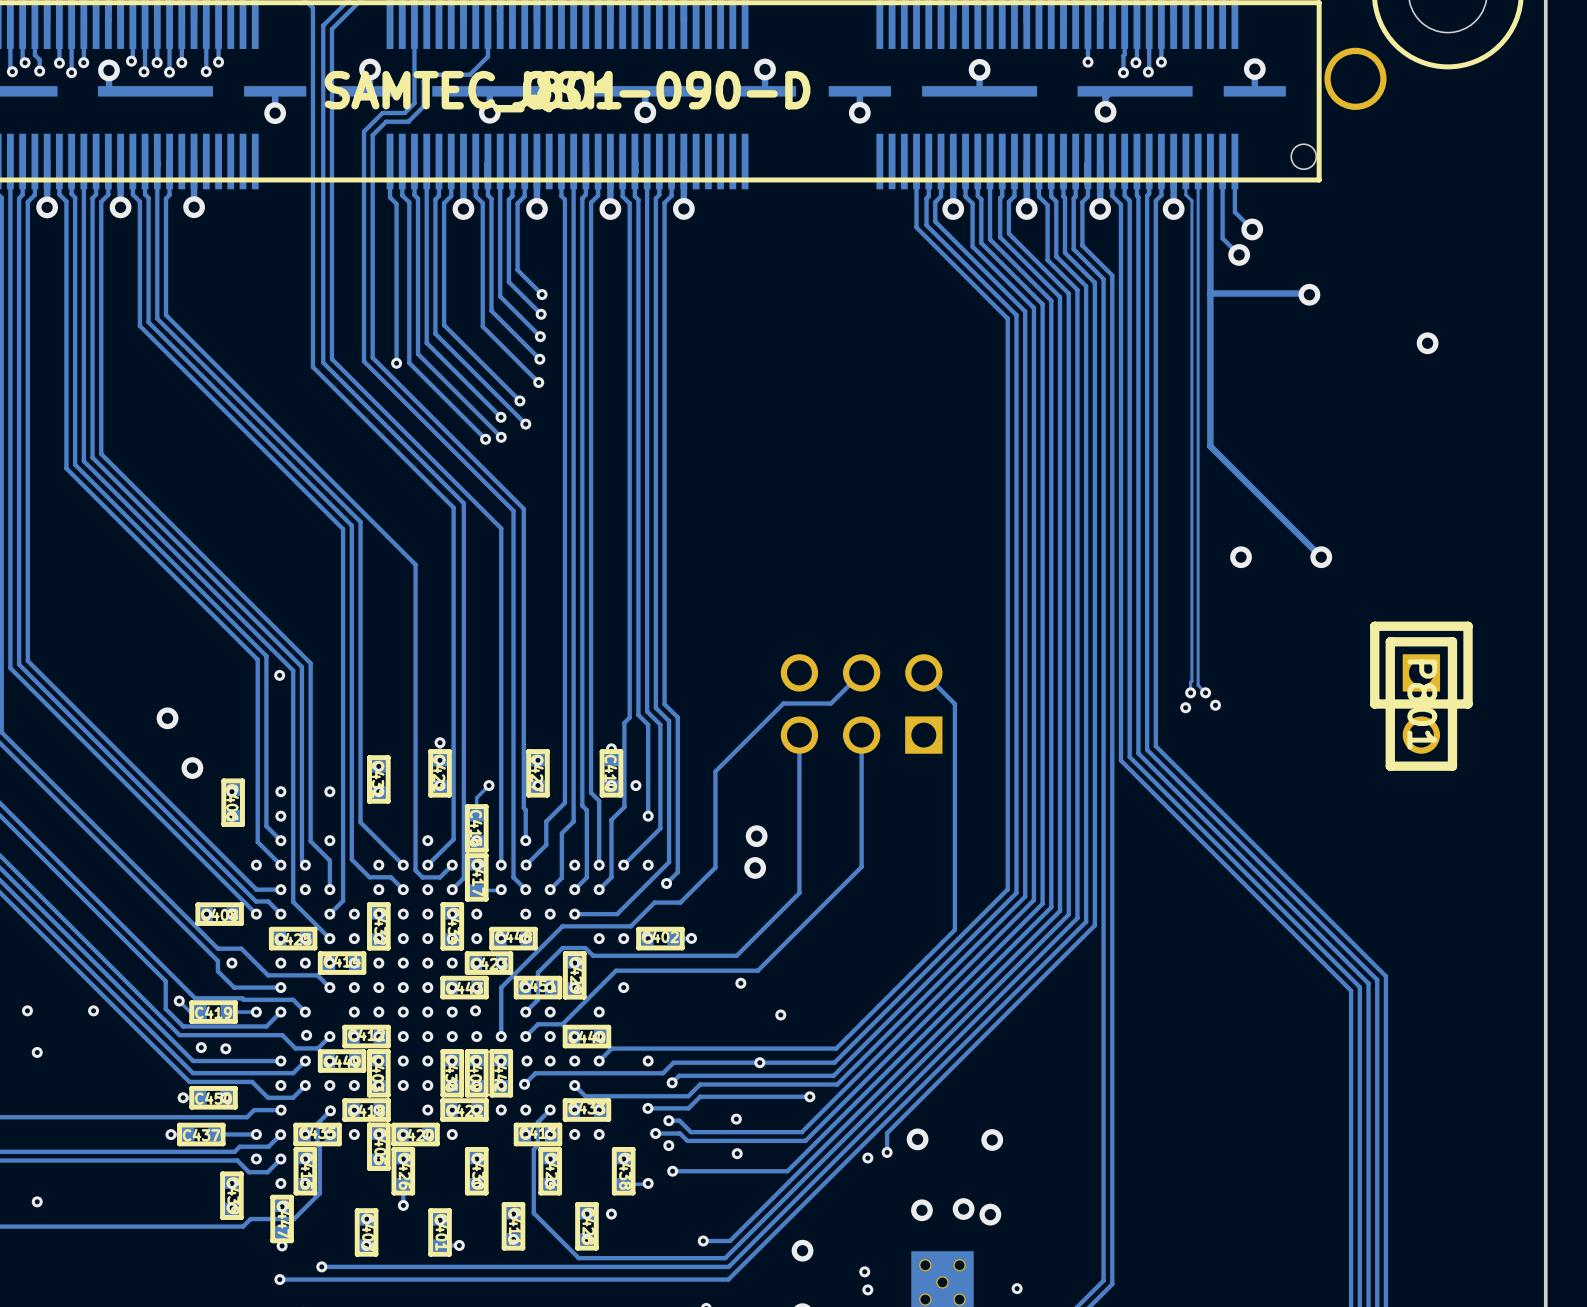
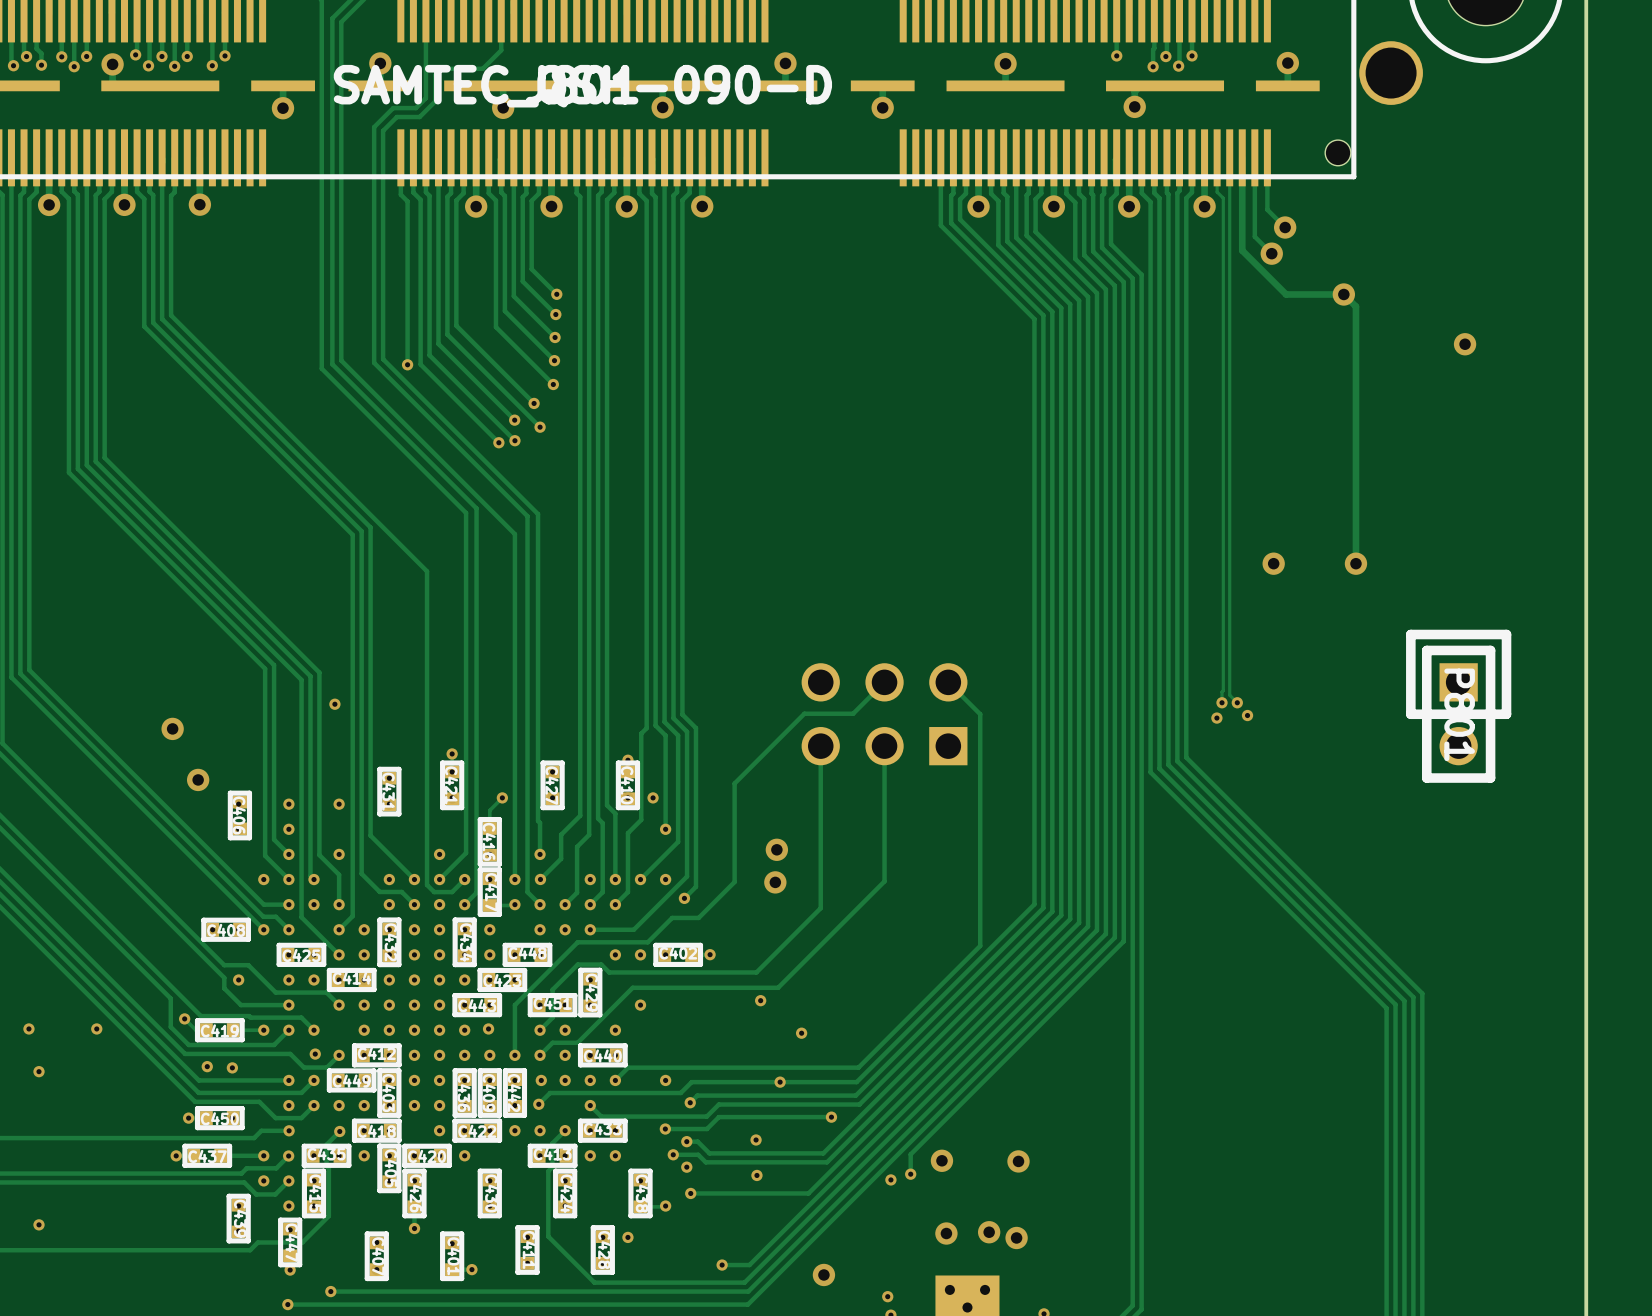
track: (1210, 251) (1210, 446) (1321, 557) -> (1242, 250) (1286, 294) (1343, 294) (1355, 306) (1355, 563)
track: (1210, 293) (1309, 294) -> none
via position: (279, 675) -> (334, 704)

